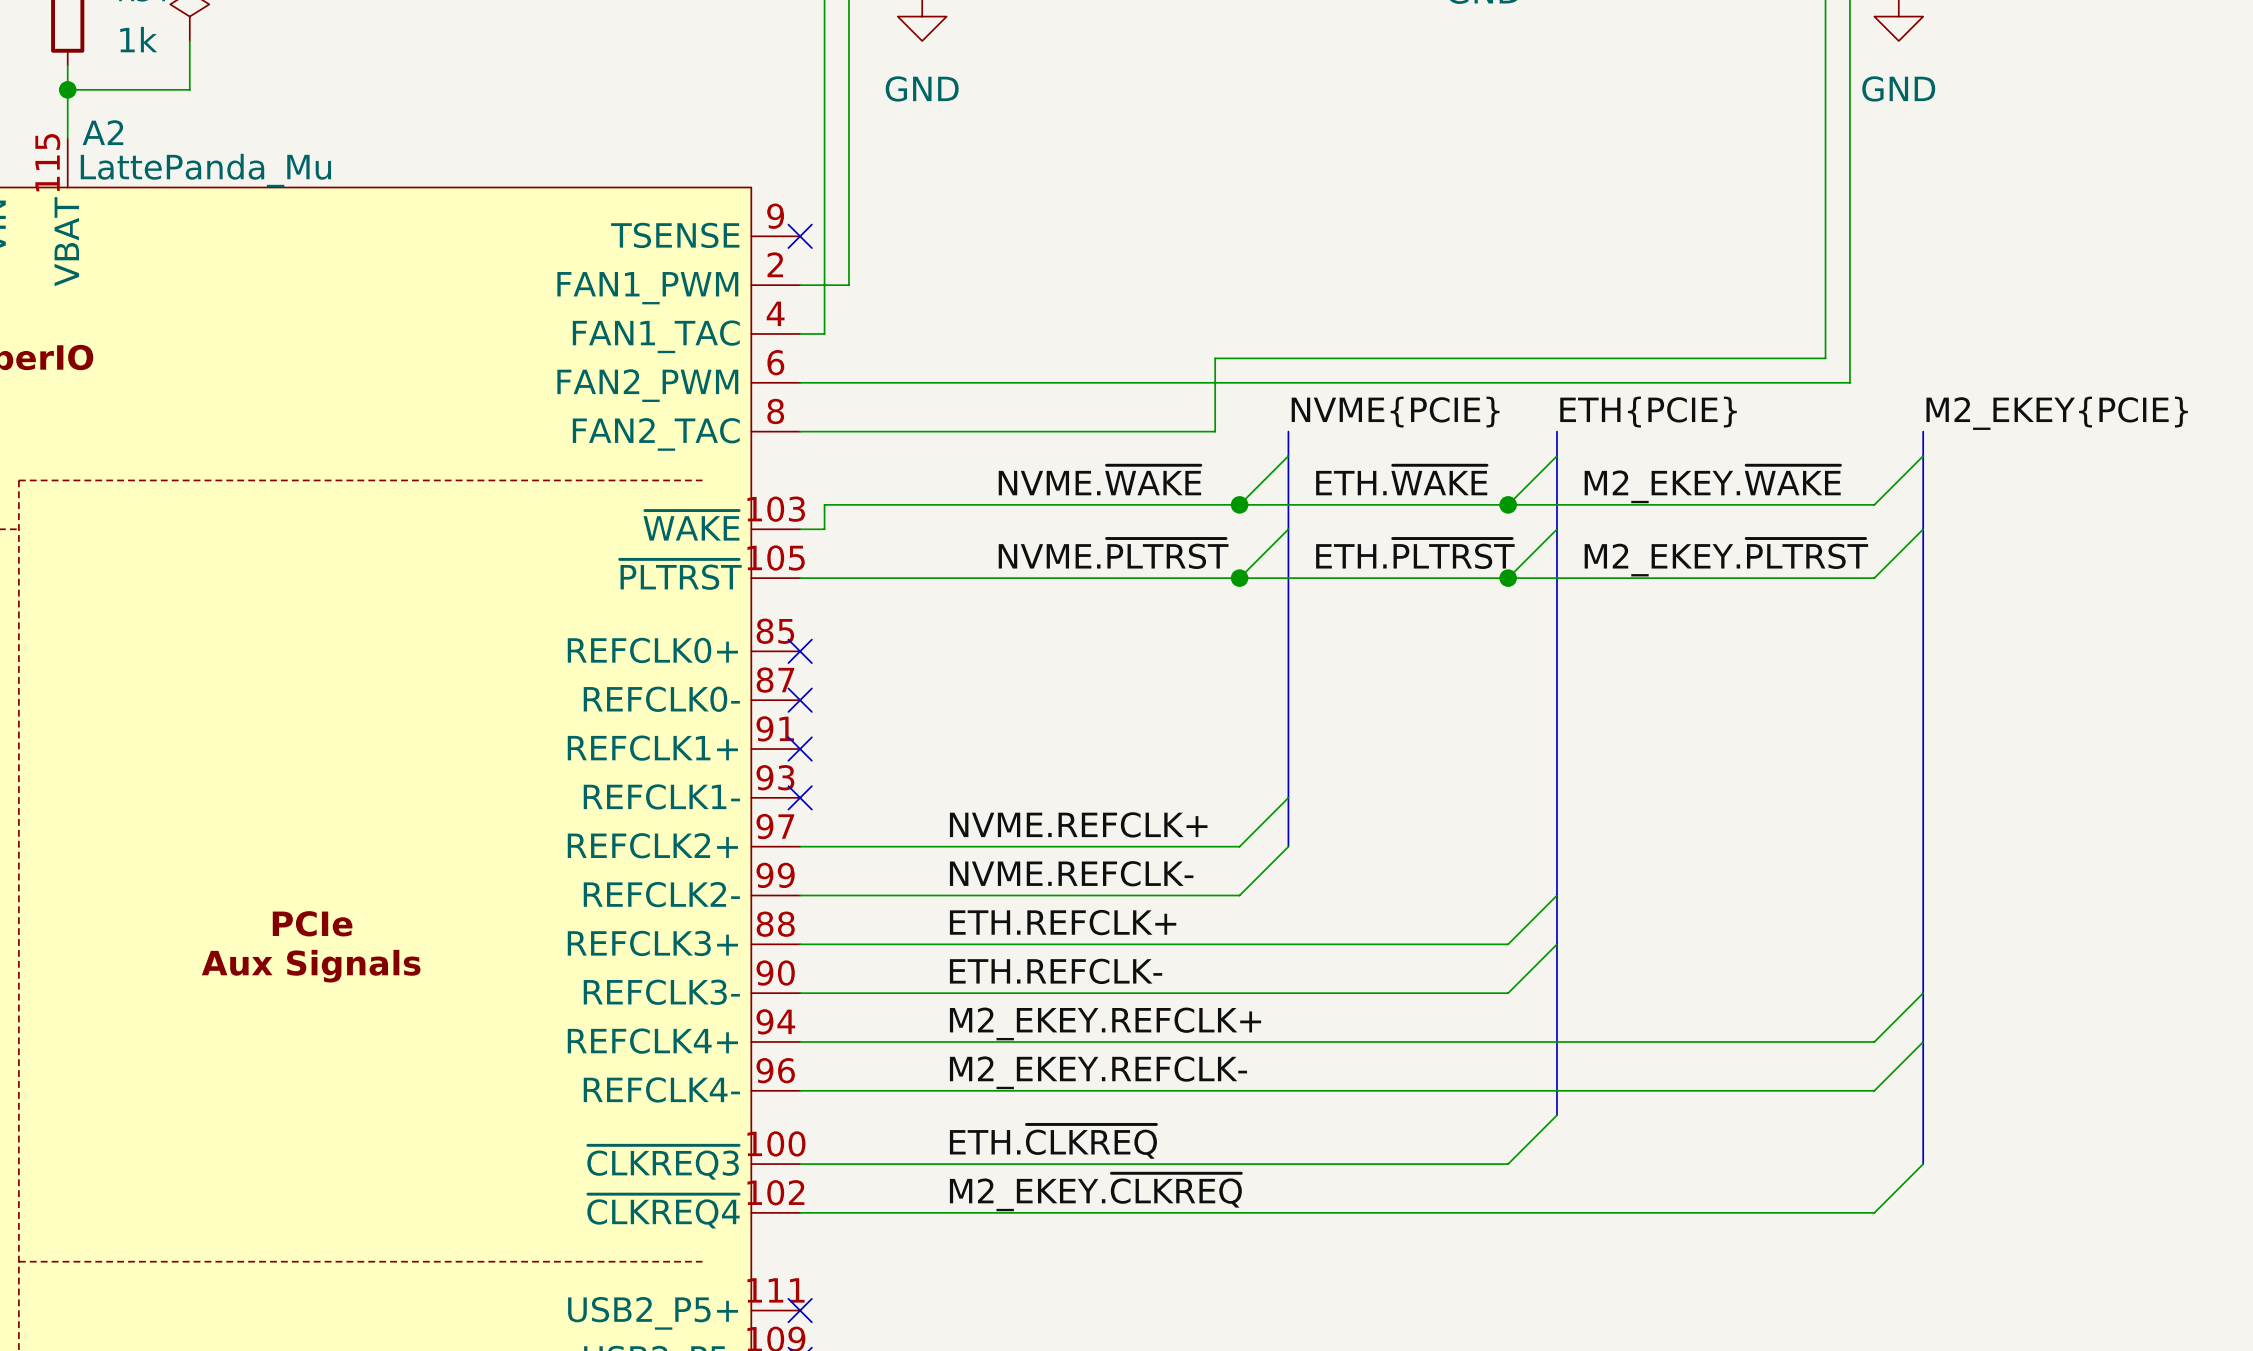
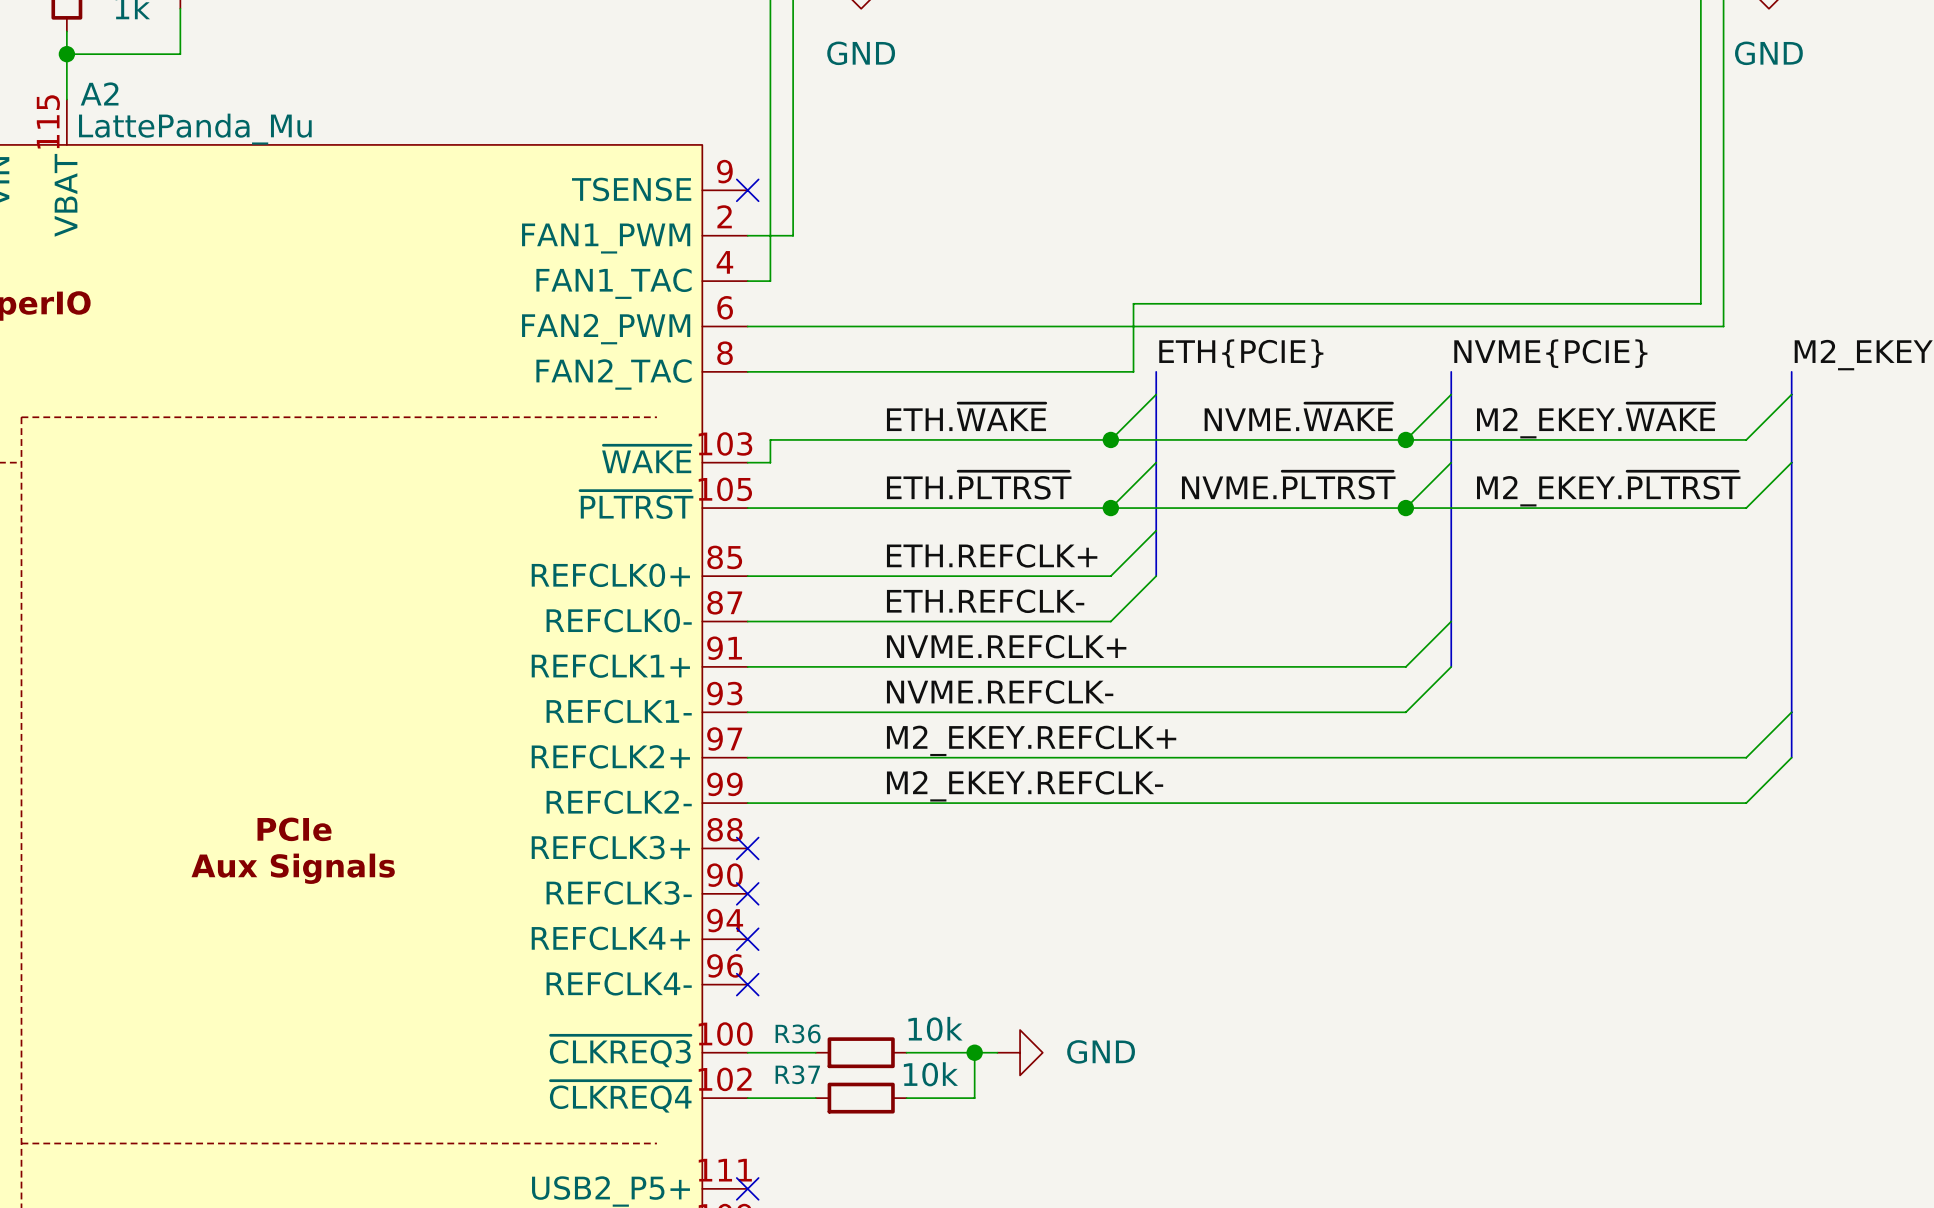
label: NVME{PCIE} (1395, 412) -> ETH{PCIE} (1241, 353)
label: ETH{PCIE} (1648, 412) -> NVME{PCIE} (1550, 353)
bus: none -> (1156, 371) (1156, 576)
bus: (1288, 431) (1288, 846) -> none
wire: (1288, 456) (1239, 504) -> (1156, 394) (1110, 439)
label position: NVME.~{WAKE} (1099, 480) -> NVME.~{WAKE} (1298, 417)
label position: ETH.~{WAKE} (1401, 480) -> ETH.~{WAKE} (966, 417)
junction: none -> (1110, 439)
junction: (1239, 504) -> none
wire: (1288, 529) (1239, 578) -> (1156, 462) (1110, 508)
label position: NVME.~{PLTRST} (1113, 553) -> NVME.~{PLTRST} (1288, 485)
label position: ETH.~{PLTRST} (1415, 553) -> ETH.~{PLTRST} (979, 485)
junction: none -> (1110, 508)
junction: (1239, 578) -> none
wire: none -> (1156, 530) (1110, 576) (747, 576)
no-connect mark: (800, 651) -> none
wire: none -> (1156, 576) (1110, 621) (747, 621)
no-connect mark: (800, 700) -> none
label: none -> NVME.REFCLK+ (1006, 646)
no-connect mark: (800, 749) -> none
bus: (1556, 749) (1556, 1115) -> none
label: none -> NVME.REFCLK- (1000, 692)
no-connect mark: (800, 797) -> none
wire: (1288, 797) (1239, 846) -> (1791, 712) (1746, 757) (1156, 757)
label: NVME.REFCLK+ (1078, 824) -> M2_EKEY.REFCLK+ (1031, 740)
wire: (1288, 846) (1239, 895) -> (1791, 757) (1746, 803) (1156, 803)
bus: (1923, 846) (1923, 1164) -> none
label: NVME.REFCLK- (1071, 873) -> M2_EKEY.REFCLK- (1025, 786)
wire: (1556, 895) (1508, 944) (800, 944) -> (1451, 621) (1405, 666) (747, 666)
label position: ETH.REFCLK+ (1063, 922) -> ETH.REFCLK+ (992, 555)
no-connect mark: none -> (747, 848)
wire: (1556, 944) (1508, 993) (800, 993) -> (1451, 666) (1405, 712) (747, 712)
label position: ETH.REFCLK- (1056, 971) -> ETH.REFCLK- (985, 601)
no-connect mark: none -> (747, 893)
wire: (1923, 993) (1874, 1041) (800, 1041) -> none
label: M2_EKEY.REFCLK+ (1105, 1023) -> none
no-connect mark: none -> (747, 939)
wire: (1923, 1041) (1874, 1090) (800, 1090) -> none
label: M2_EKEY.REFCLK- (1098, 1072) -> none
no-connect mark: none -> (747, 984)
wire: (1556, 1115) (1508, 1164) (1068, 1164) -> none
label: ETH.~{CLKREQ} (1053, 1141) -> none
wire: (873, 1164) (971, 1164) -> none
R36: none -> 10k (861, 1052)
junction: none -> (974, 1052)
power symbol: none -> GND (1020, 1052)
wire: (1923, 1164) (1874, 1212) (1044, 1212) -> (974, 1052) (974, 1098)
label: M2_EKEY.~{CLKREQ} (1095, 1192) -> none
wire: (873, 1212) (971, 1212) -> none
R37: none -> 10k (861, 1098)

